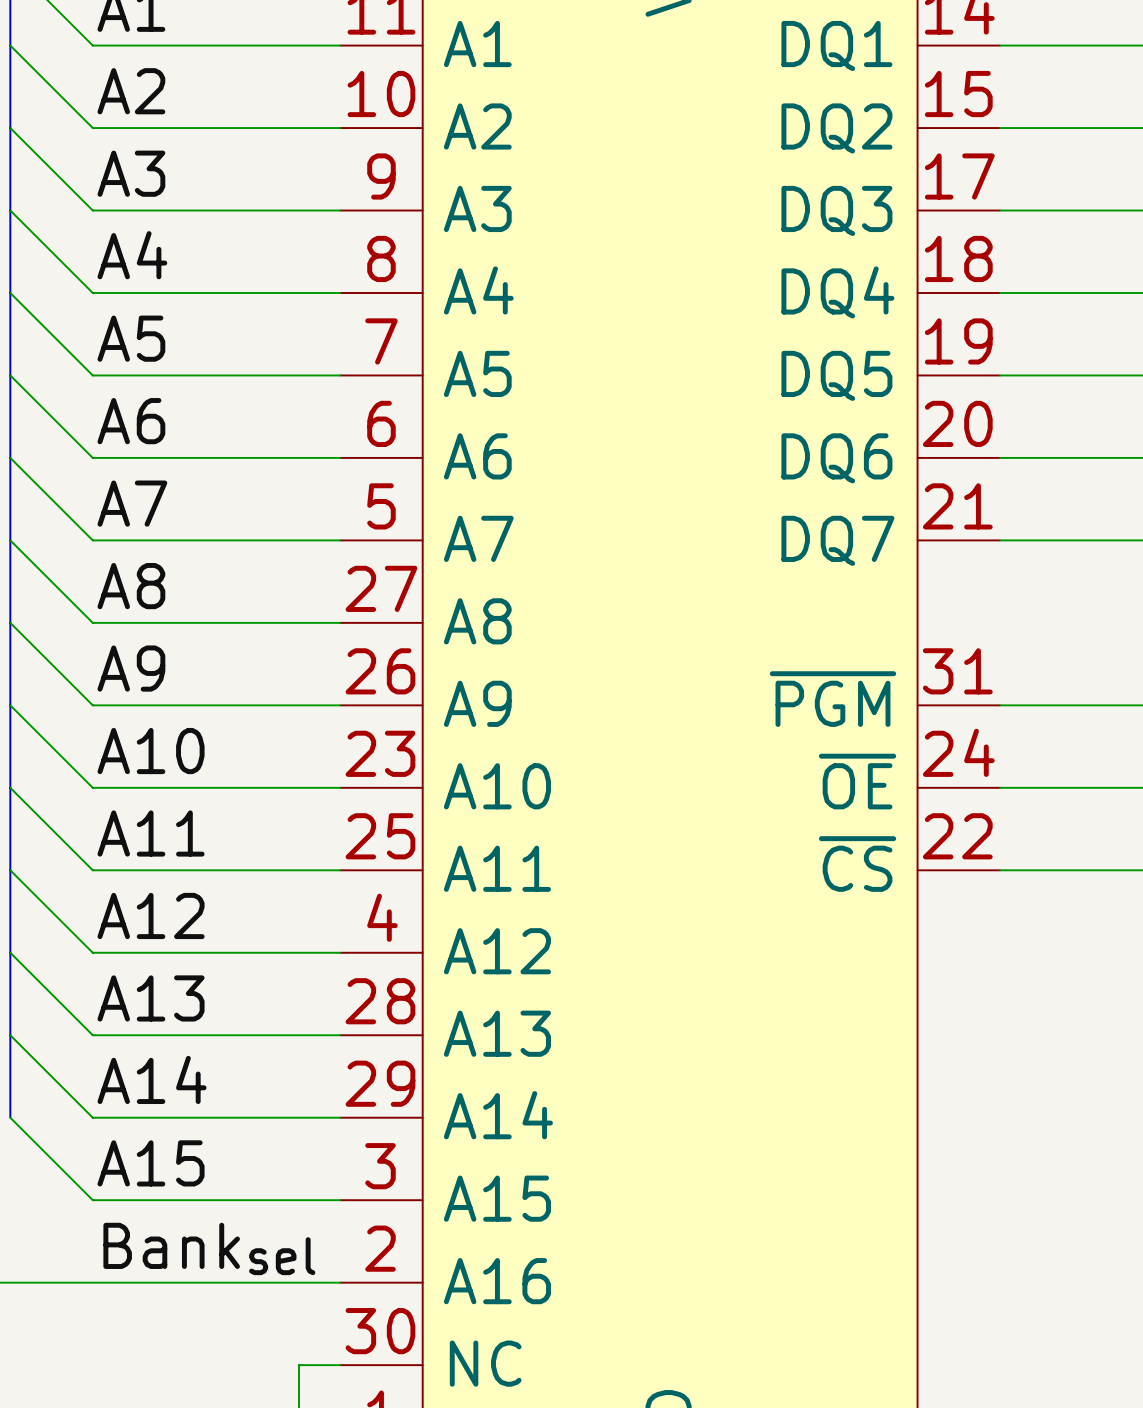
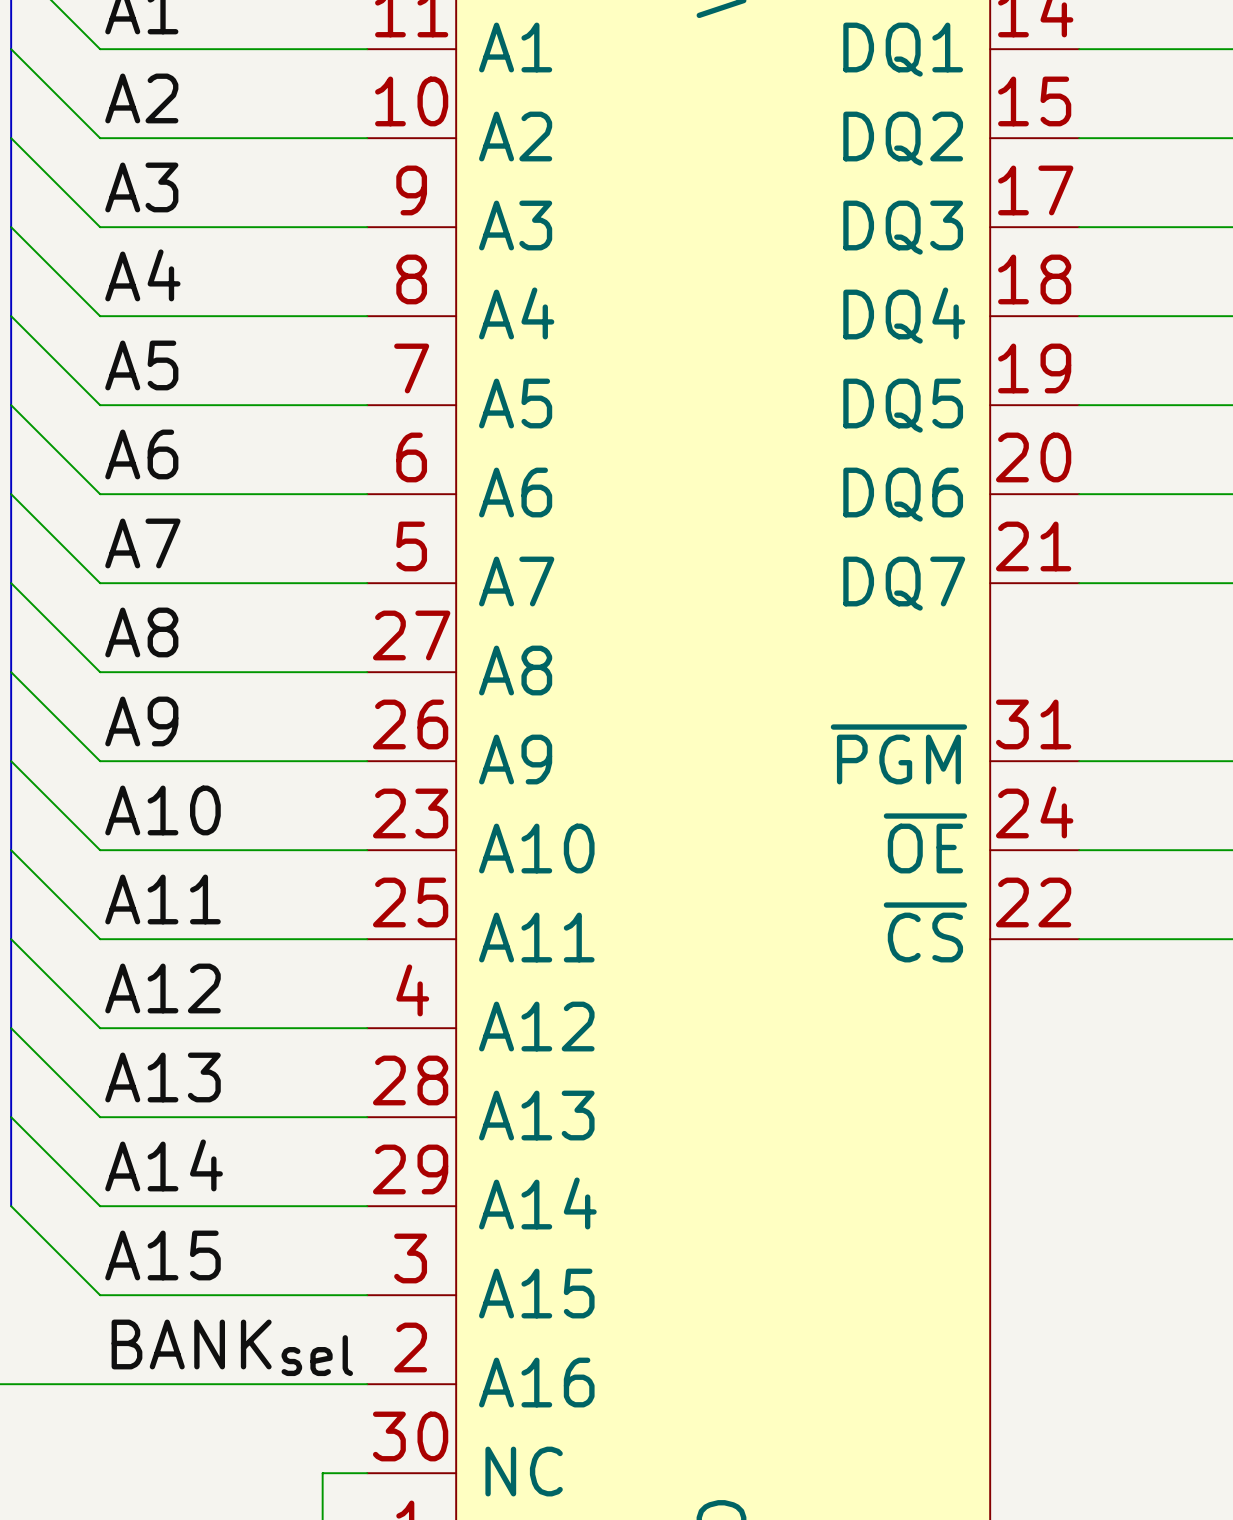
label: Banksel (209, 1248) -> BANKsel (232, 1347)

